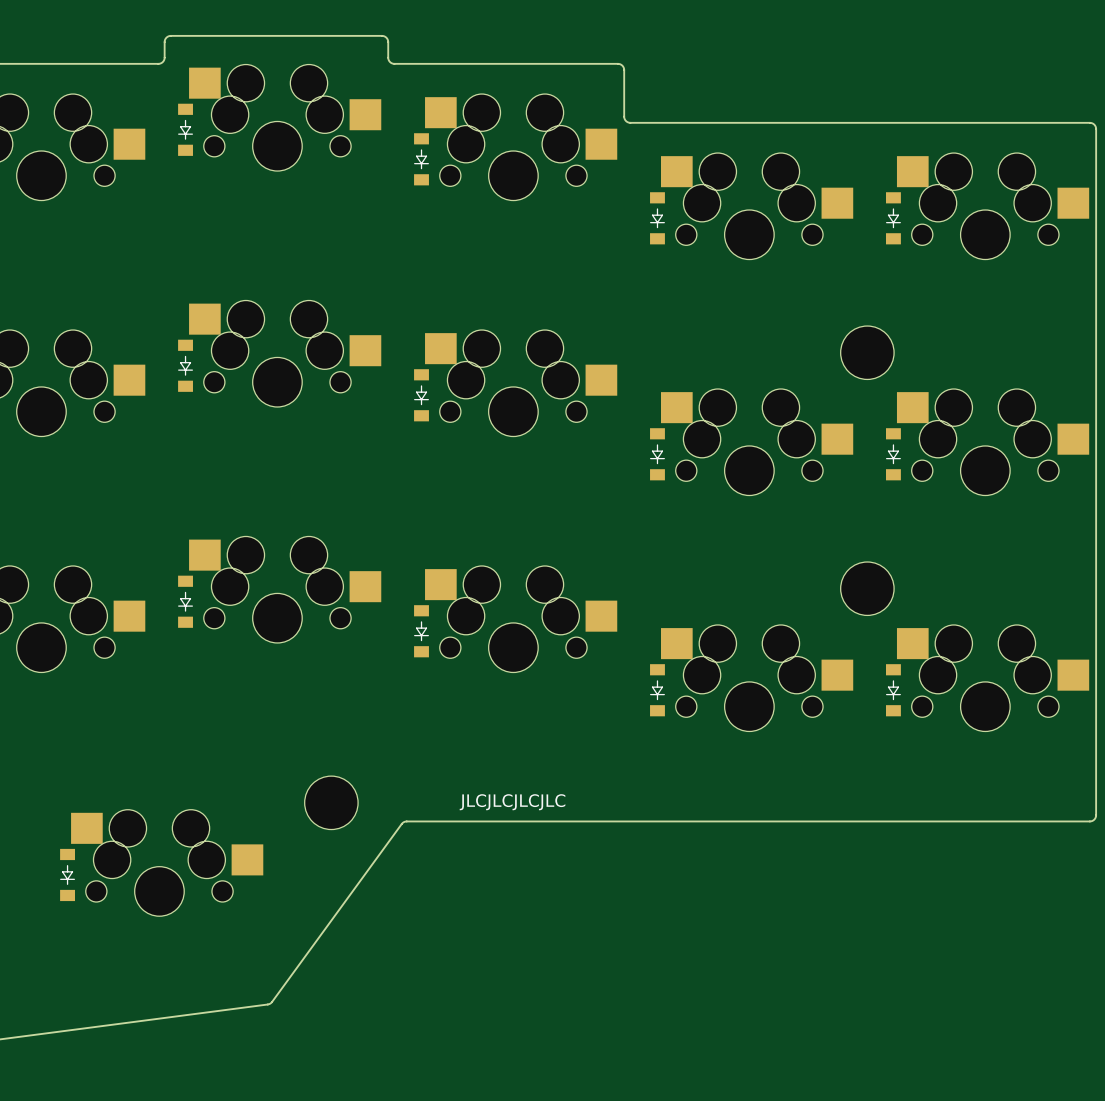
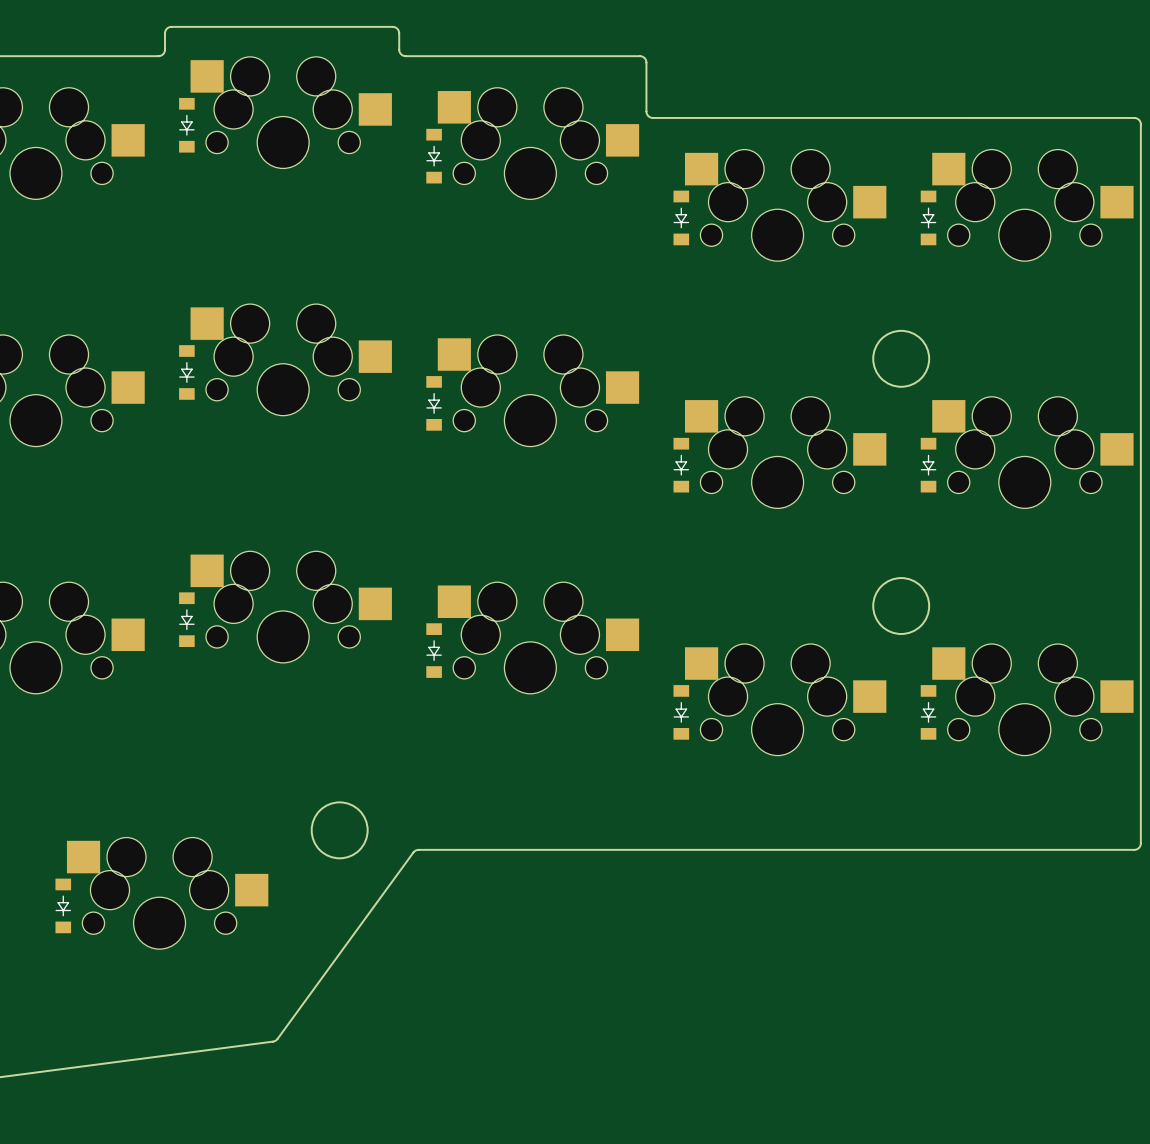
round board edge: none -> [872, 329, 931, 388]
part: (867, 352) -> none
round board edge: none -> [872, 577, 931, 635]
part: (867, 588) -> none
round board edge: none -> [310, 801, 369, 860]
part: (331, 802) -> none
text: JLCJLCJLCJLC (512, 802) -> none

